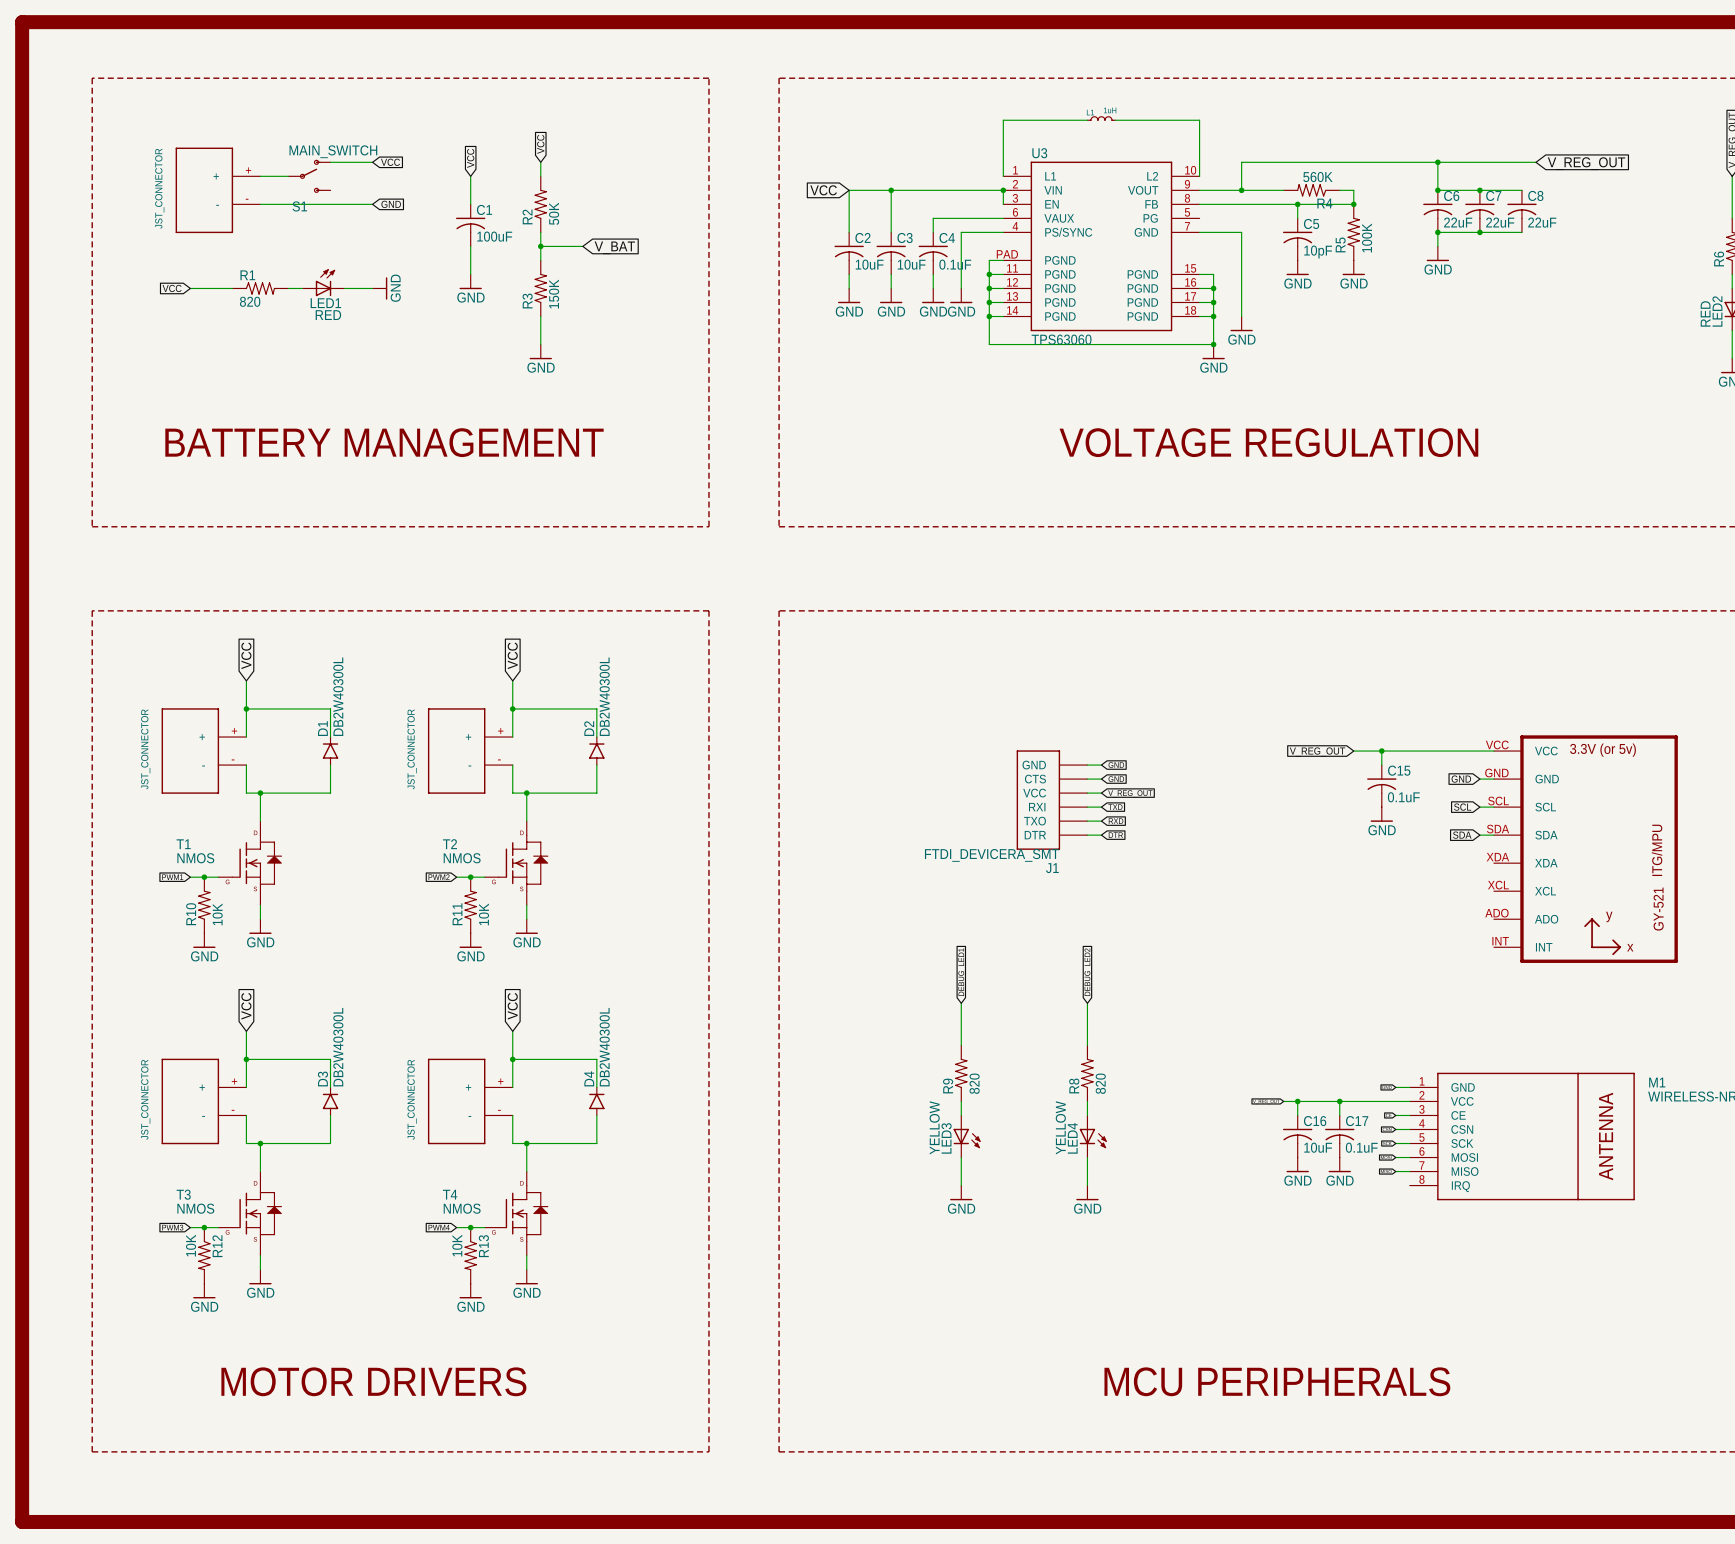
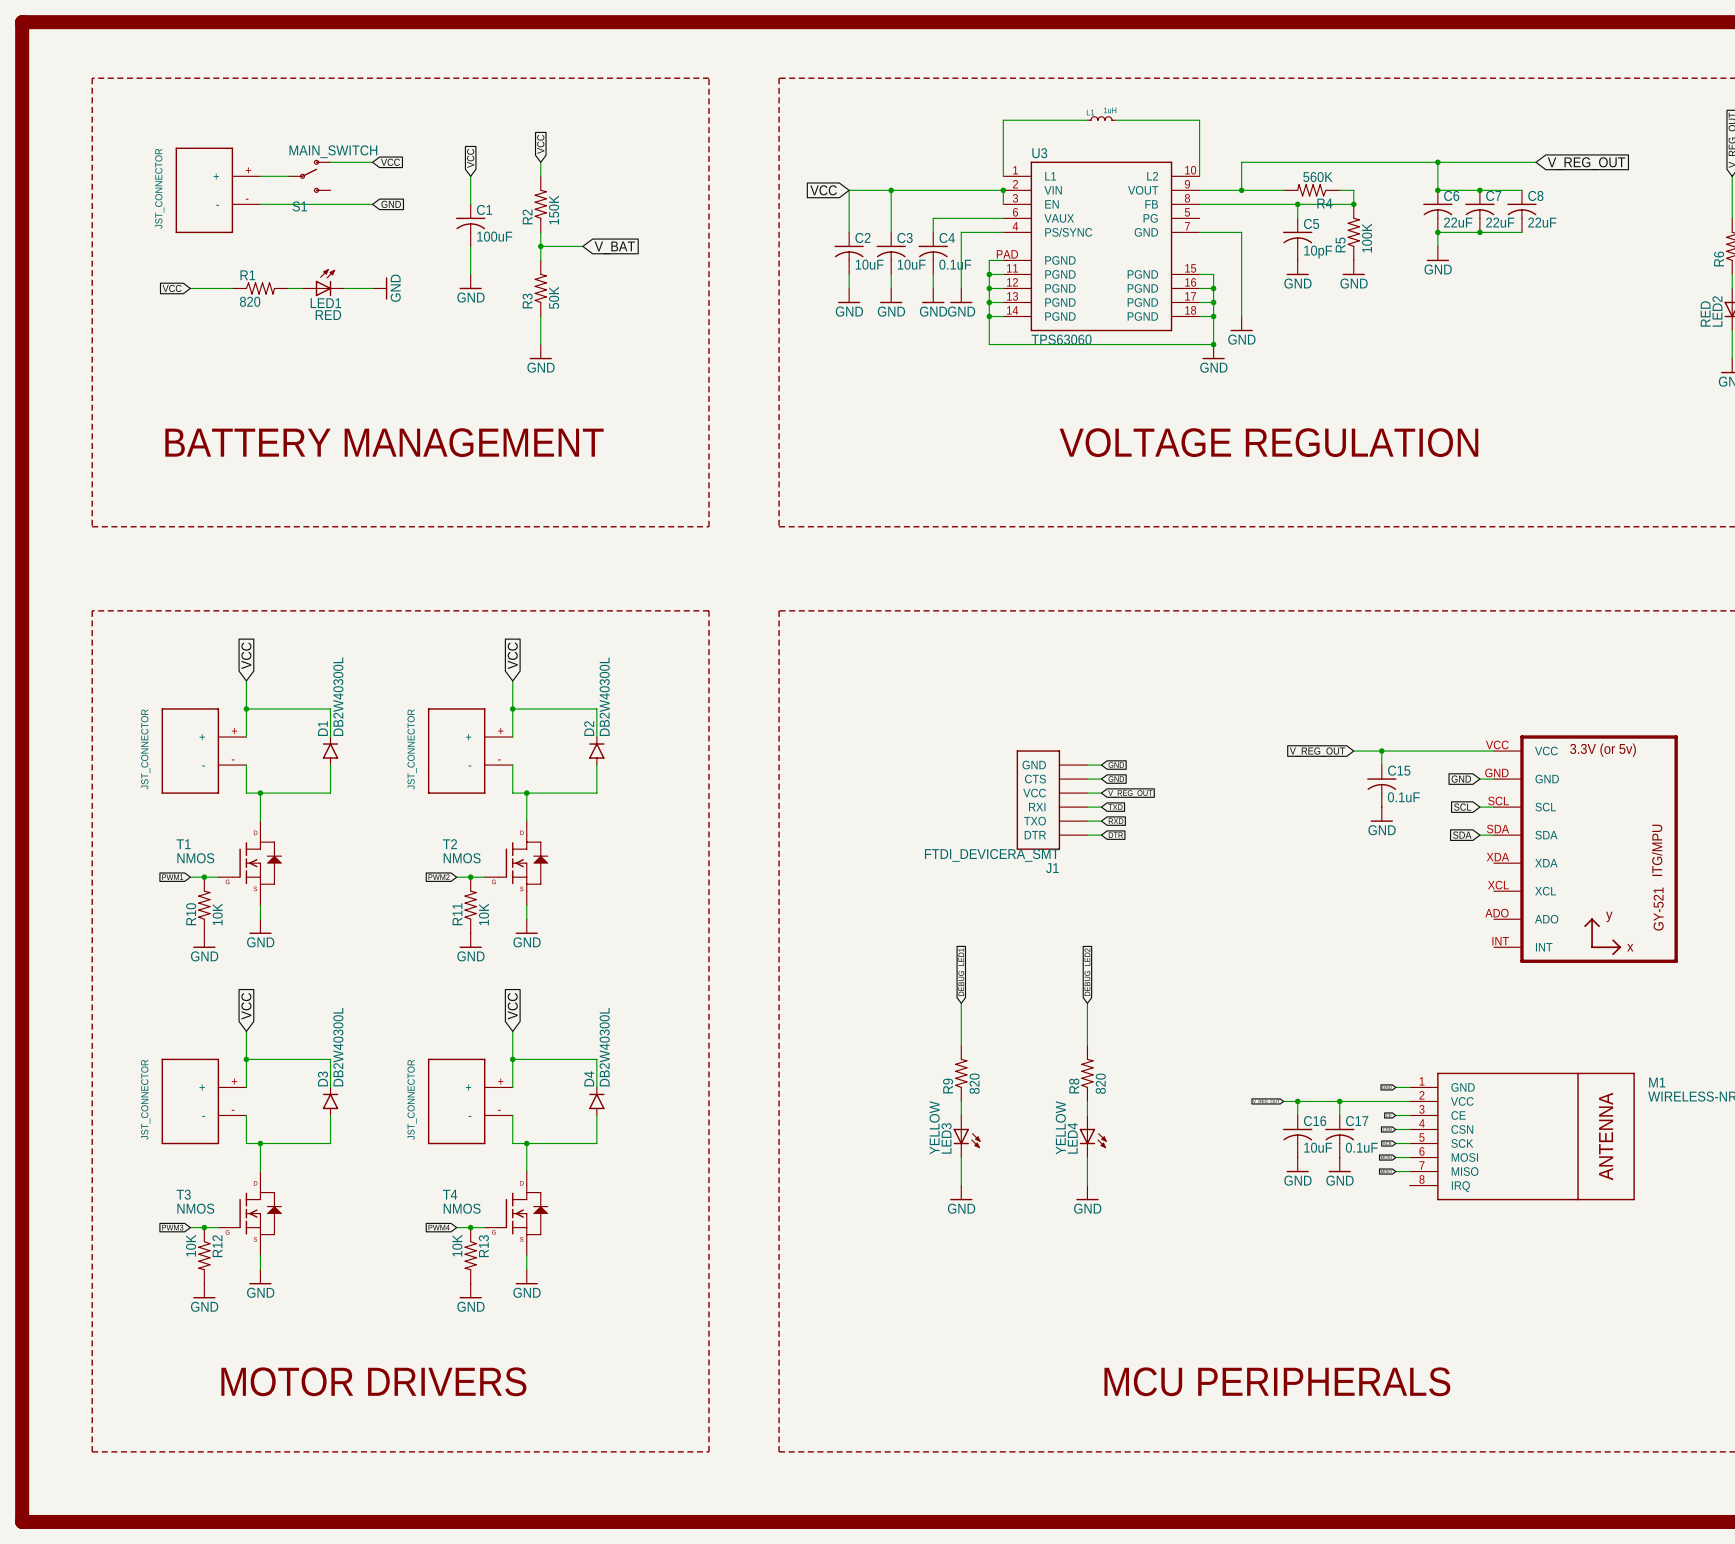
R2 value: 50K (554, 213) -> 150K (554, 209)
R3 value: 150K (554, 294) -> 50K (554, 297)

